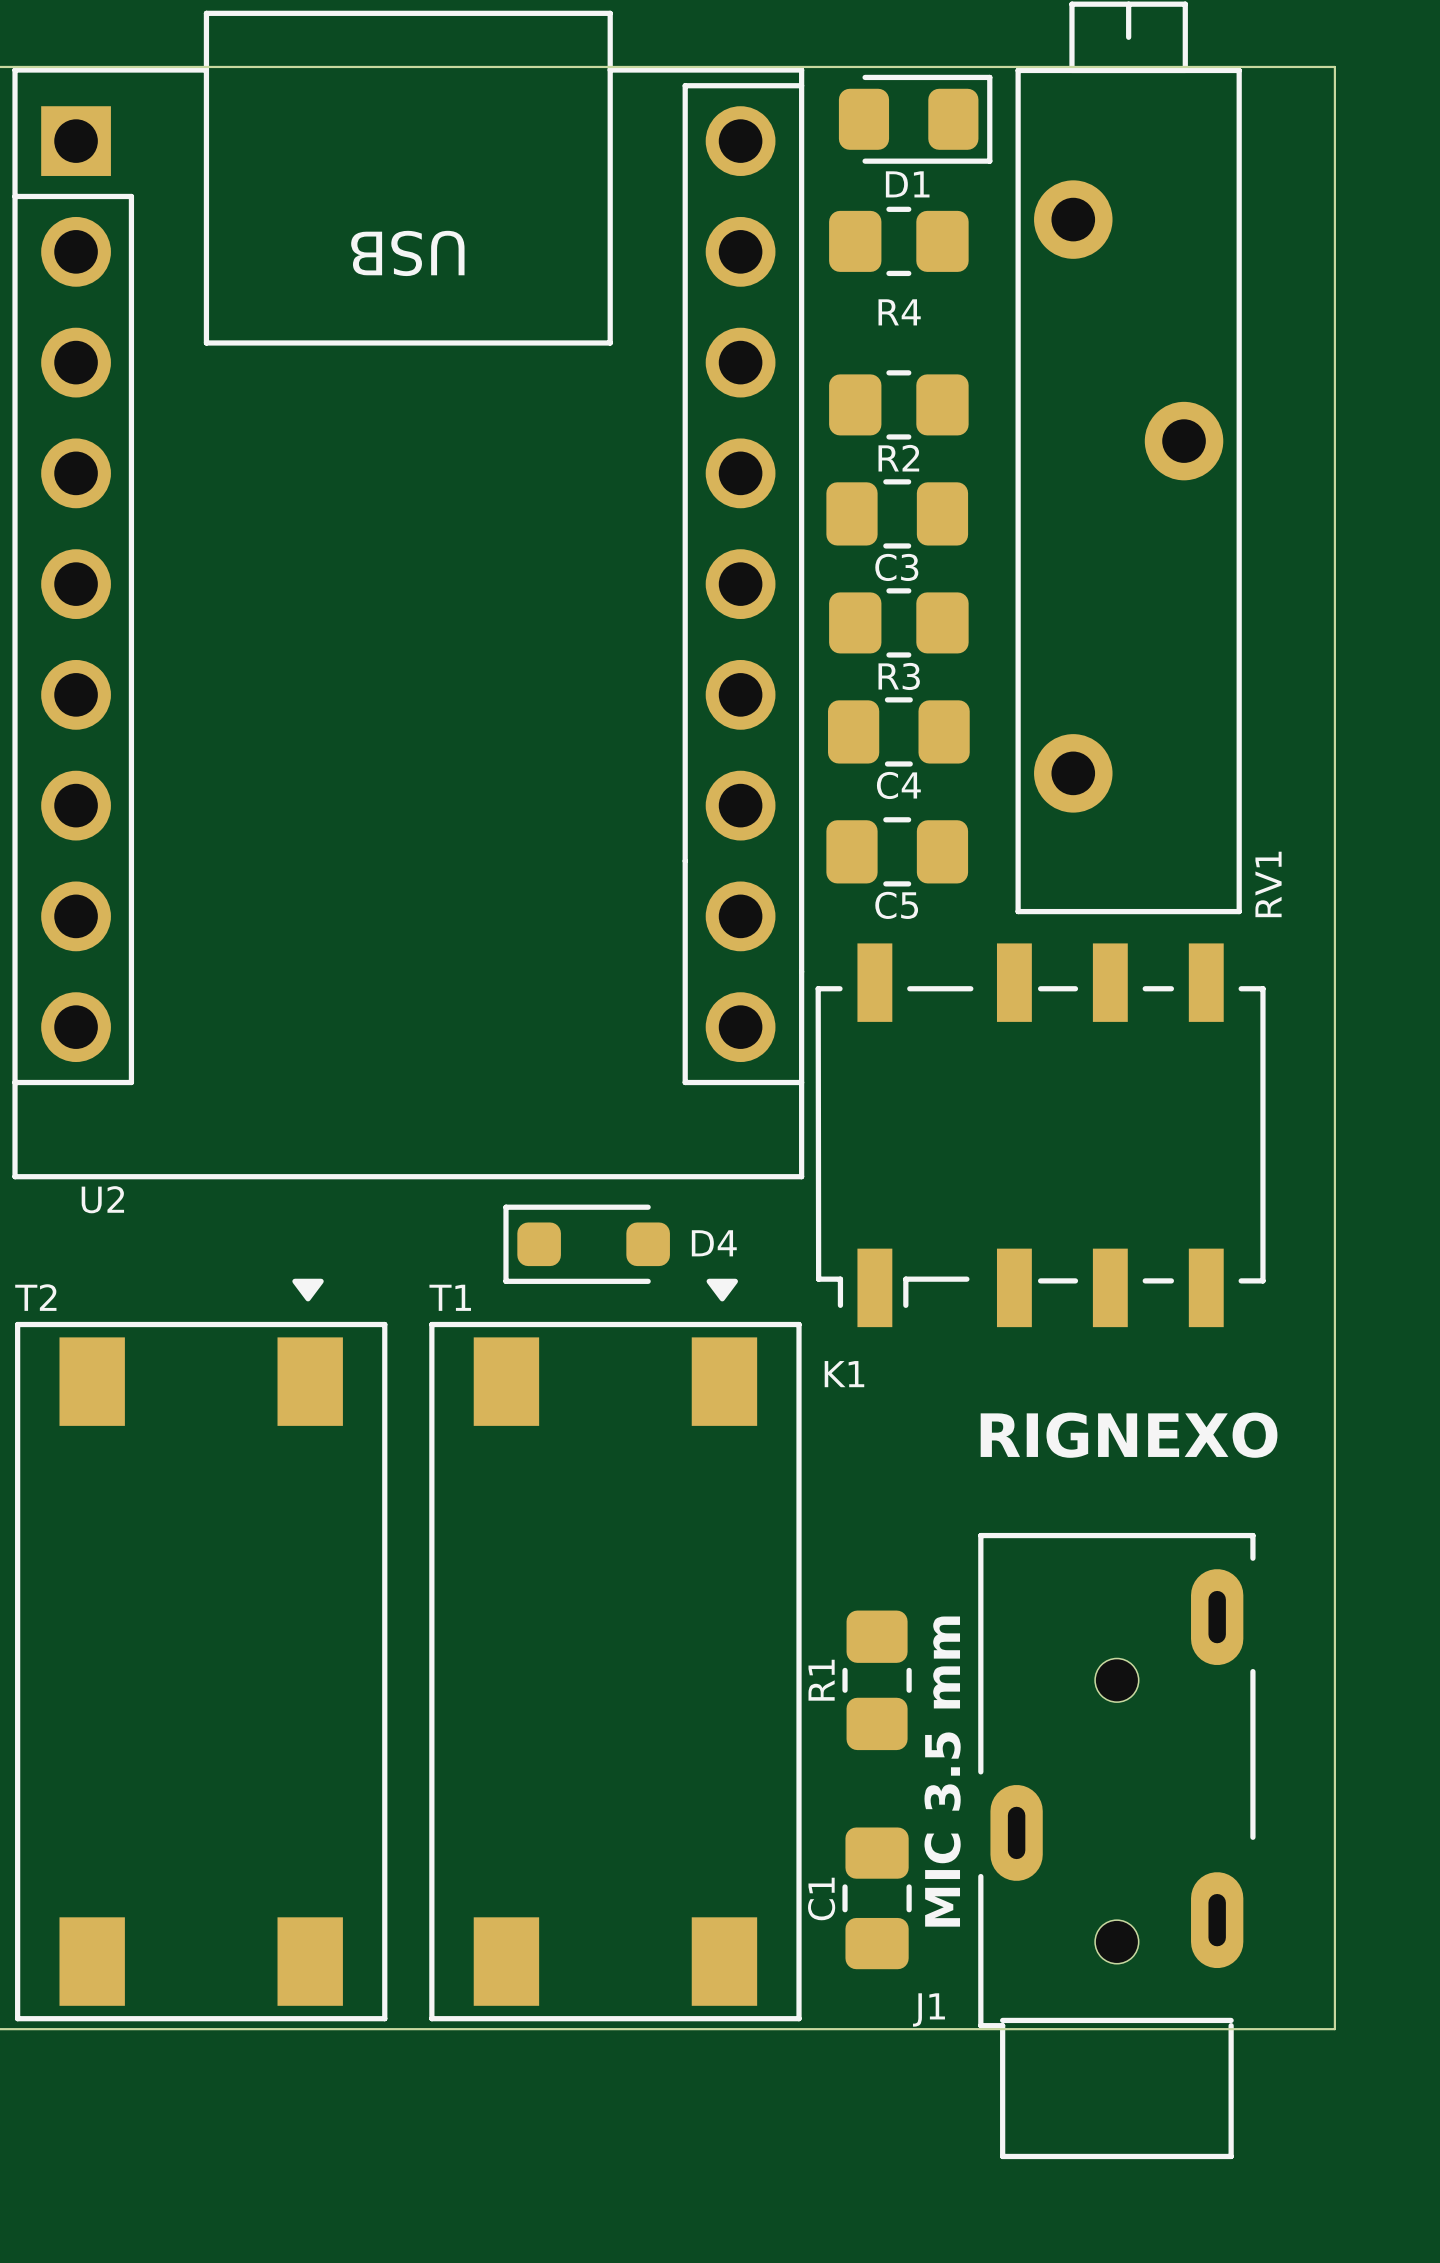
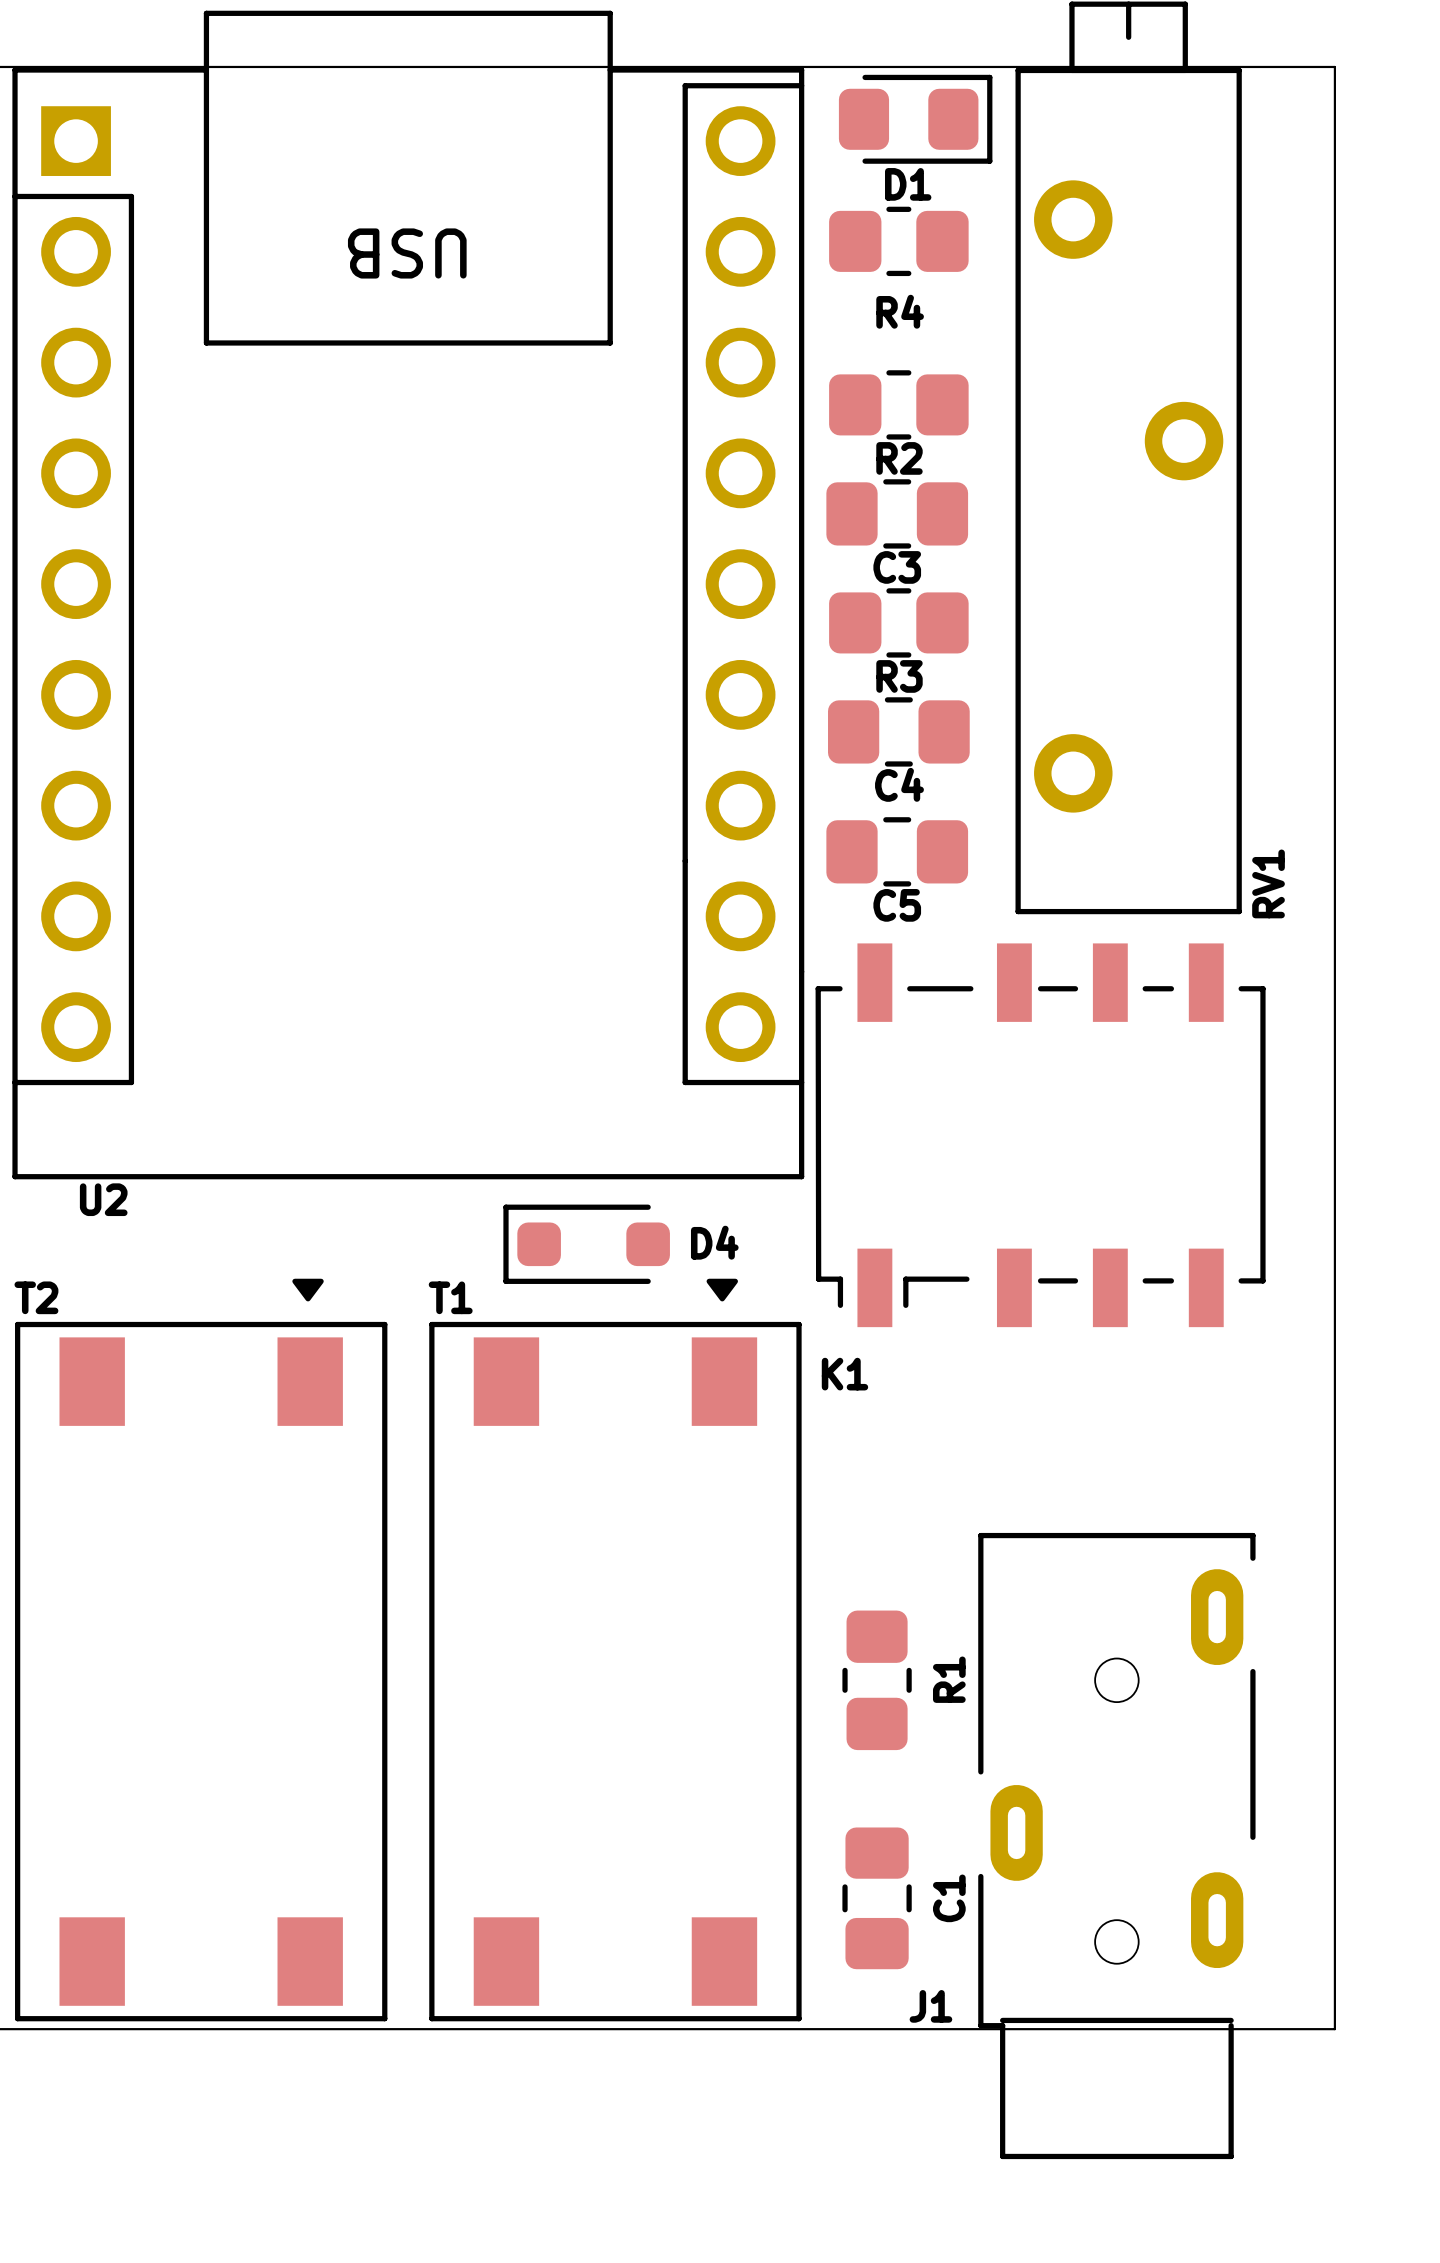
text: RIGNEXO (1129, 1435) -> none
R1 name position: R1 (821, 1680) -> R1 (949, 1679)
text: MIC 3.5 mm (942, 1771) -> none
C1 name position: C1 (821, 1898) -> C1 (949, 1898)

